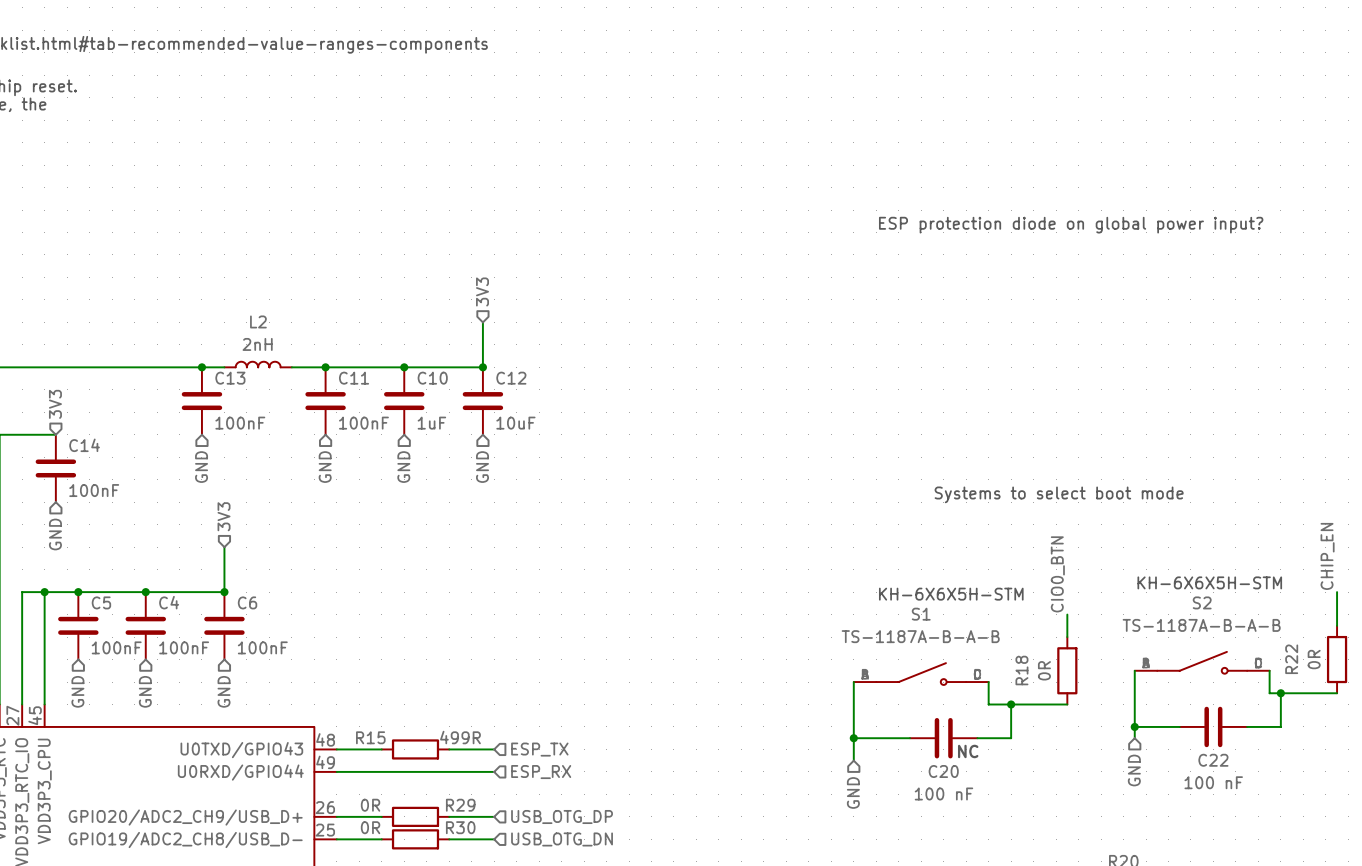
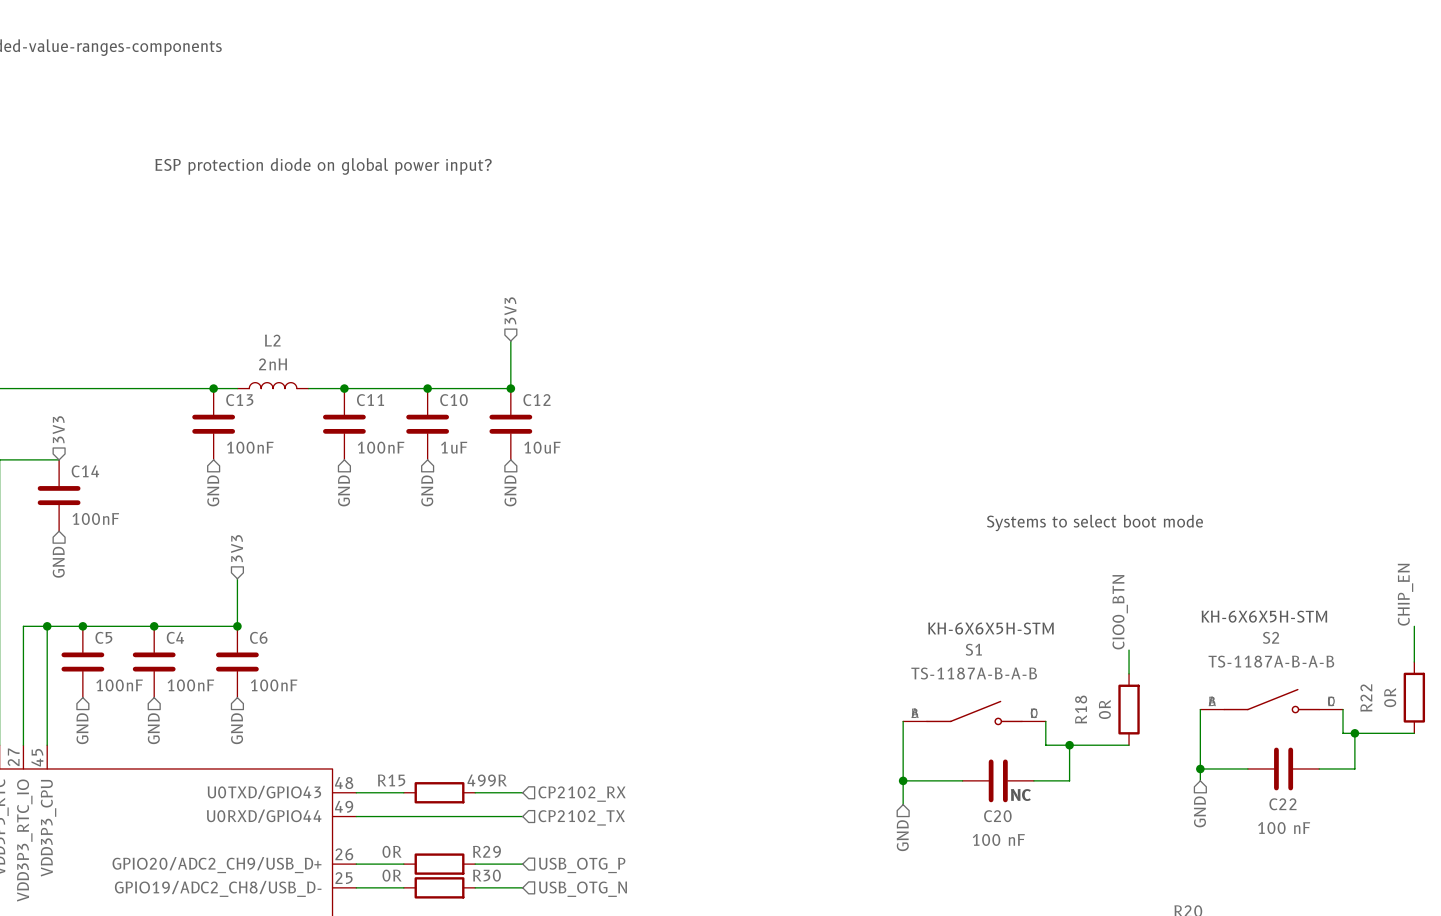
text: none -> ESP protection diode on global power input? (323, 166)
text: ESP protection diode on global power input? (1071, 225) -> none
hierarchical label: ESP_TX (539, 749) -> CP2102_RX (582, 794)
hierarchical label: ESP_RX (541, 772) -> CP2102_TX (581, 817)
hierarchical label: USB_OTG_DP (562, 816) -> USB_OTG_P (582, 865)
hierarchical label: USB_OTG_DN (562, 839) -> USB_OTG_N (582, 889)

